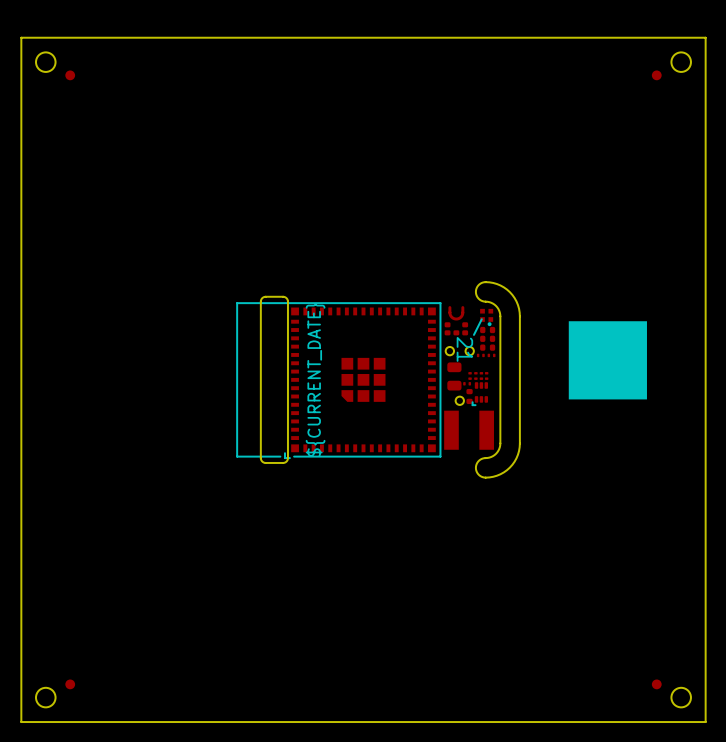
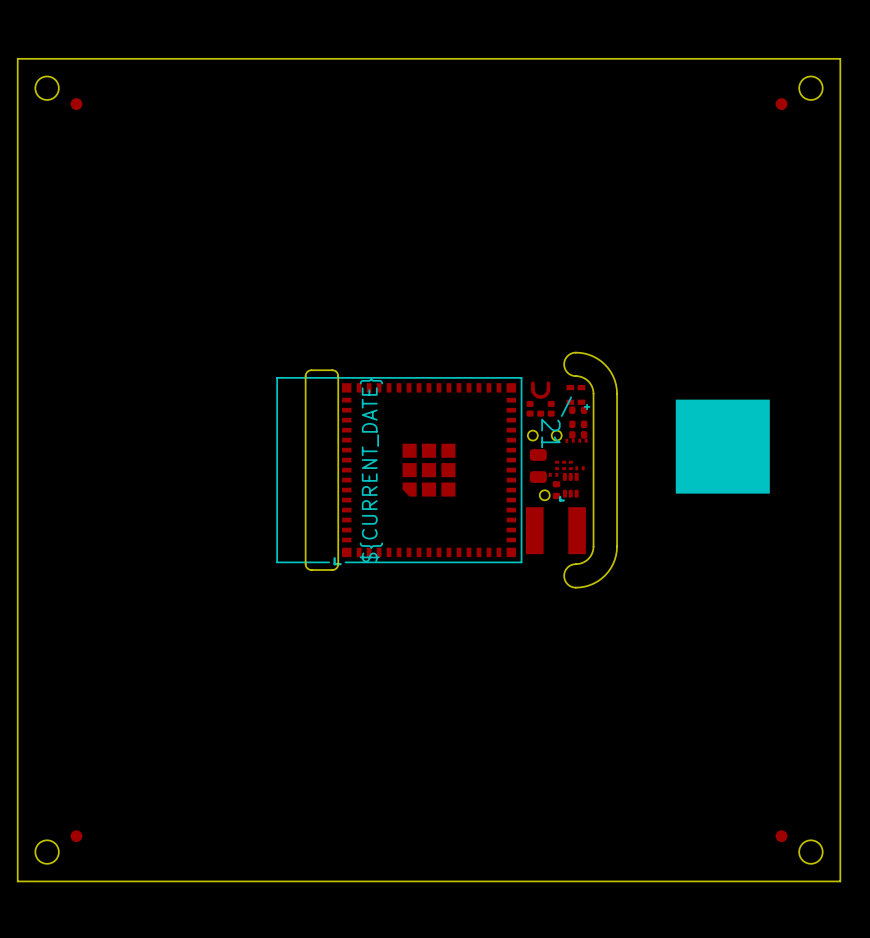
part footprint: [480, 308, 494, 327] -> [566, 384, 591, 410]
part: (487, 338) -> none
part: none -> (578, 424)
part: (487, 347) -> none
part: none -> (578, 434)
part rotation: 0° (486, 375) -> 90° clockwise (580, 468)

